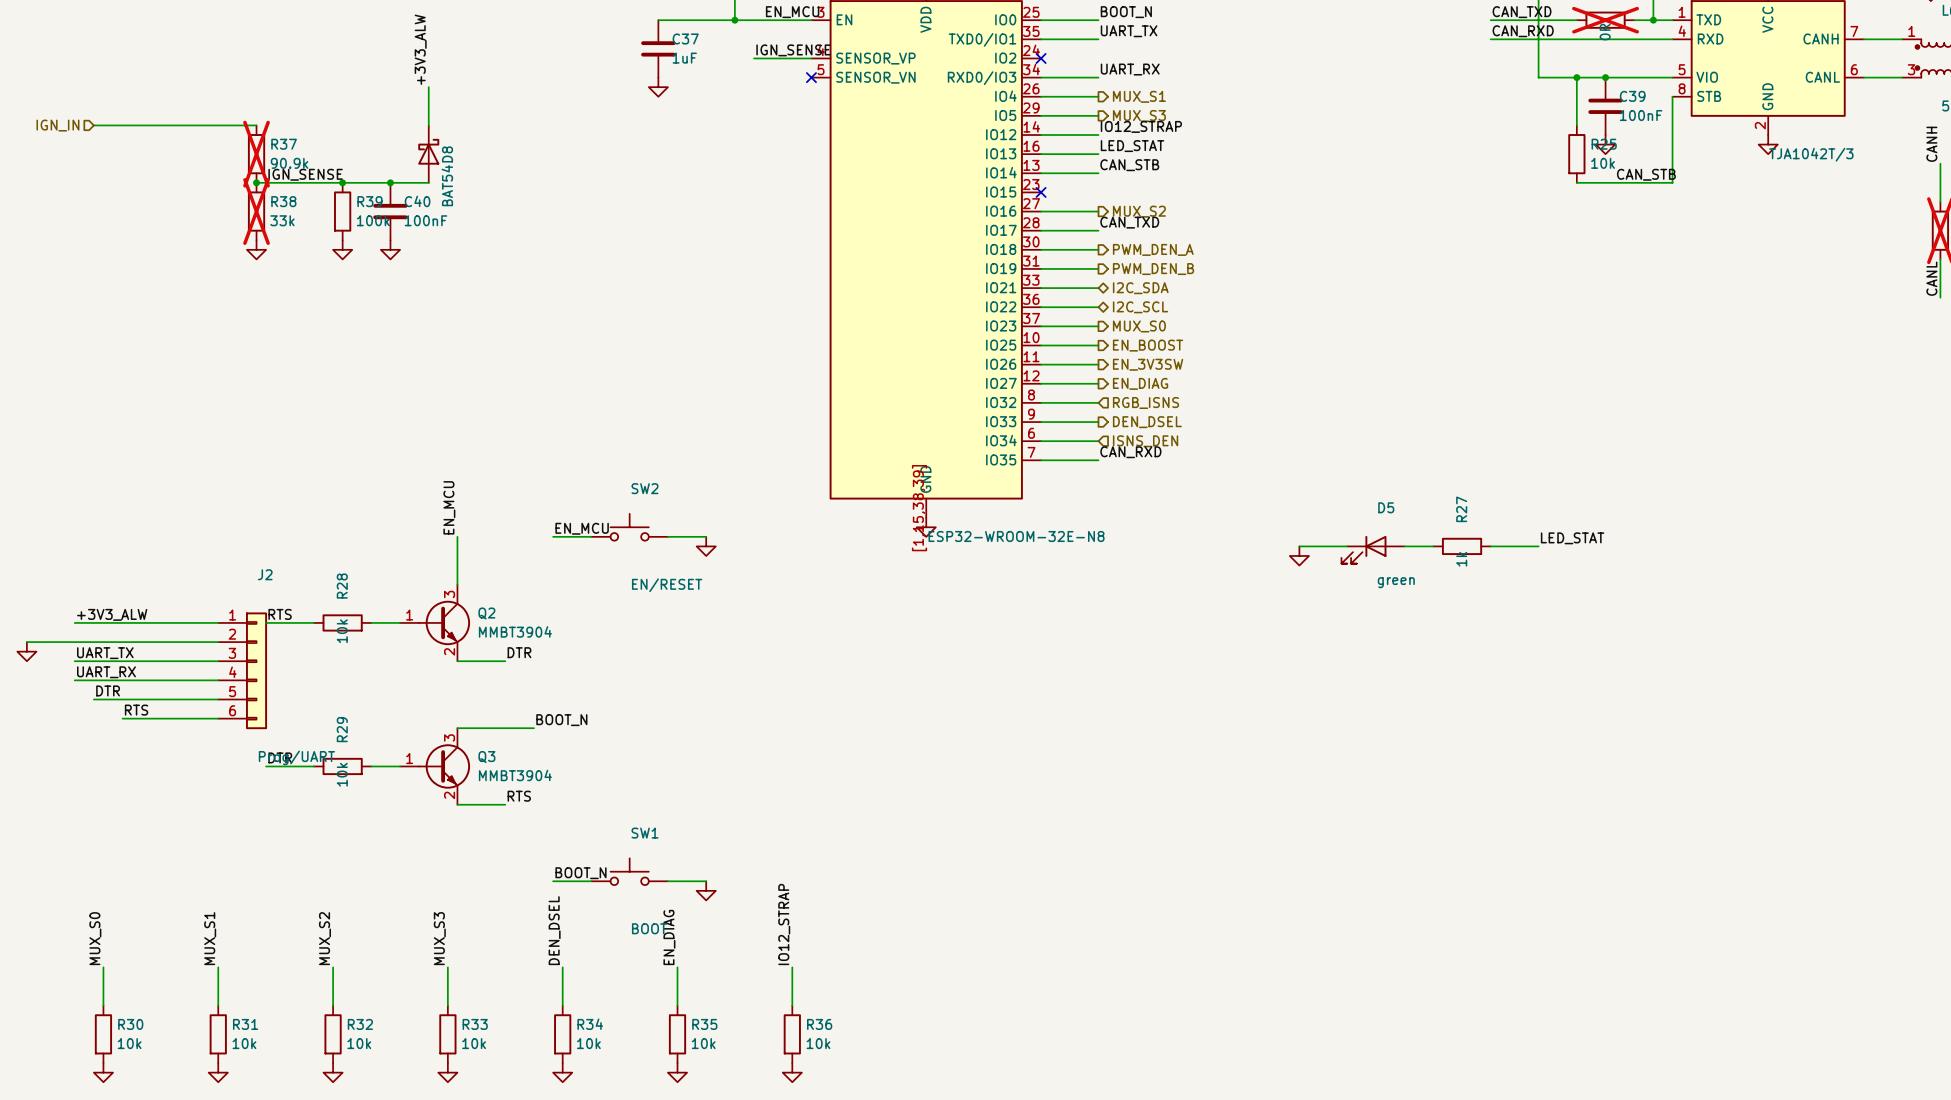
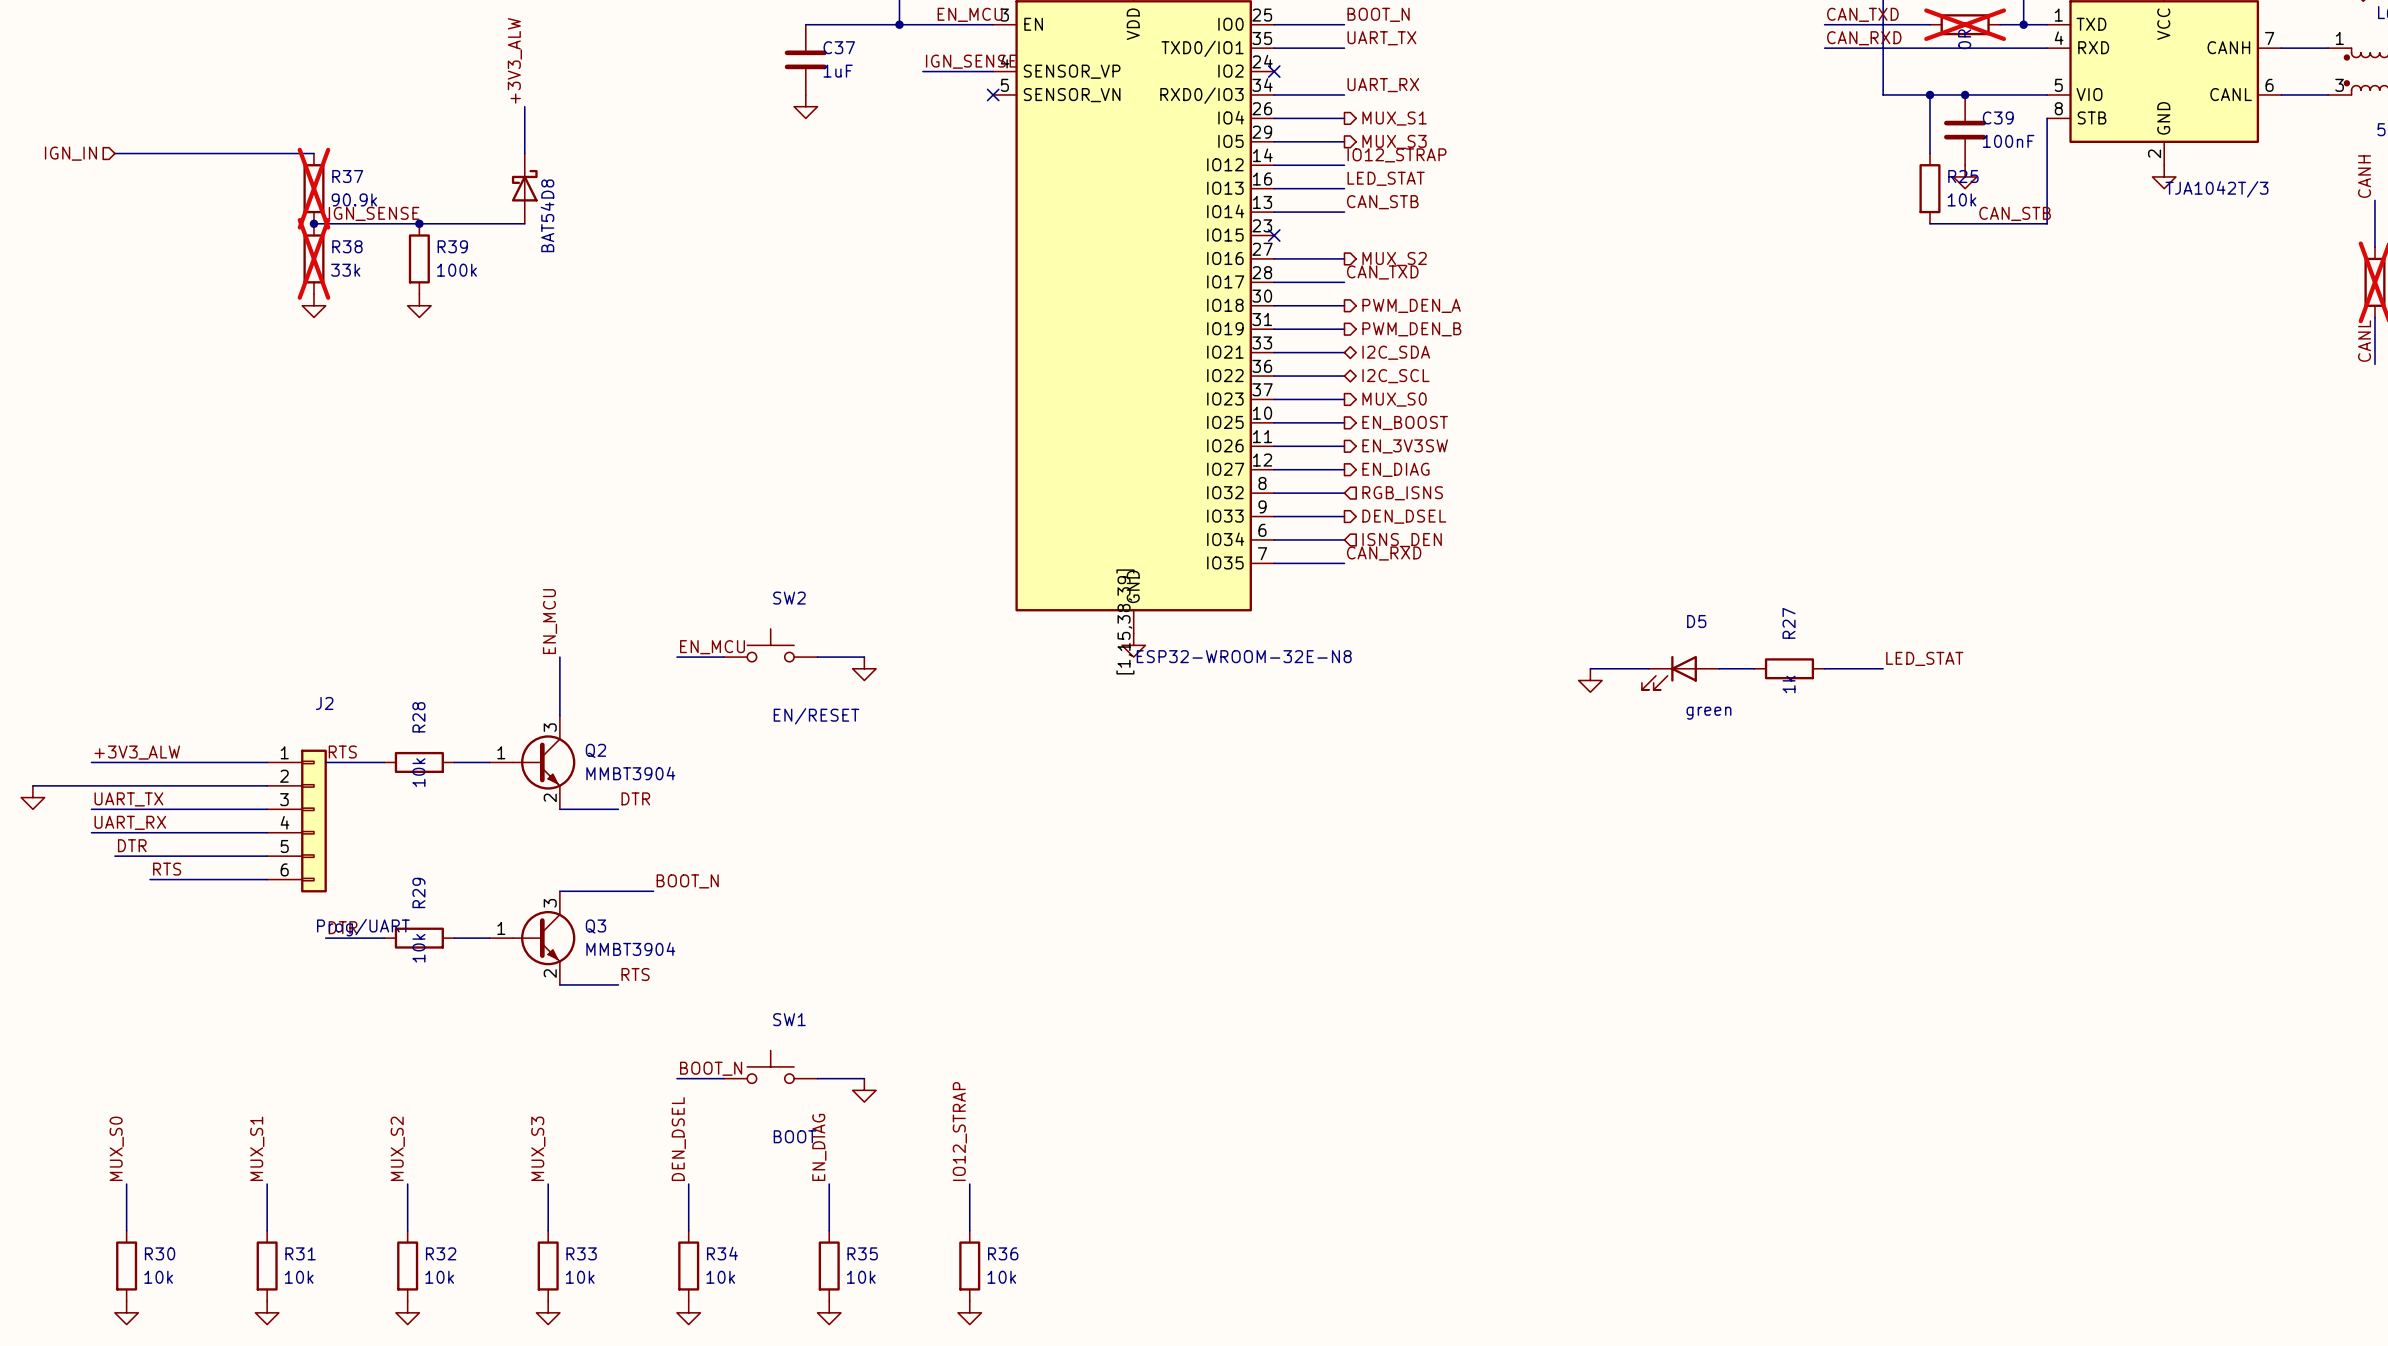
junction: (390, 182) -> none
C40: 100nF (390, 211) -> none
power symbol: (390, 249) -> none

